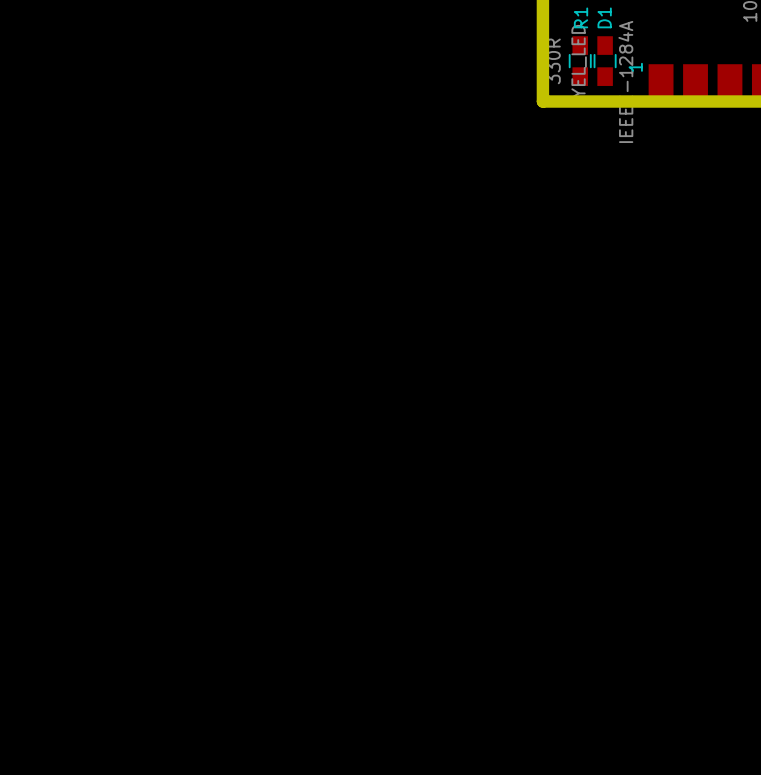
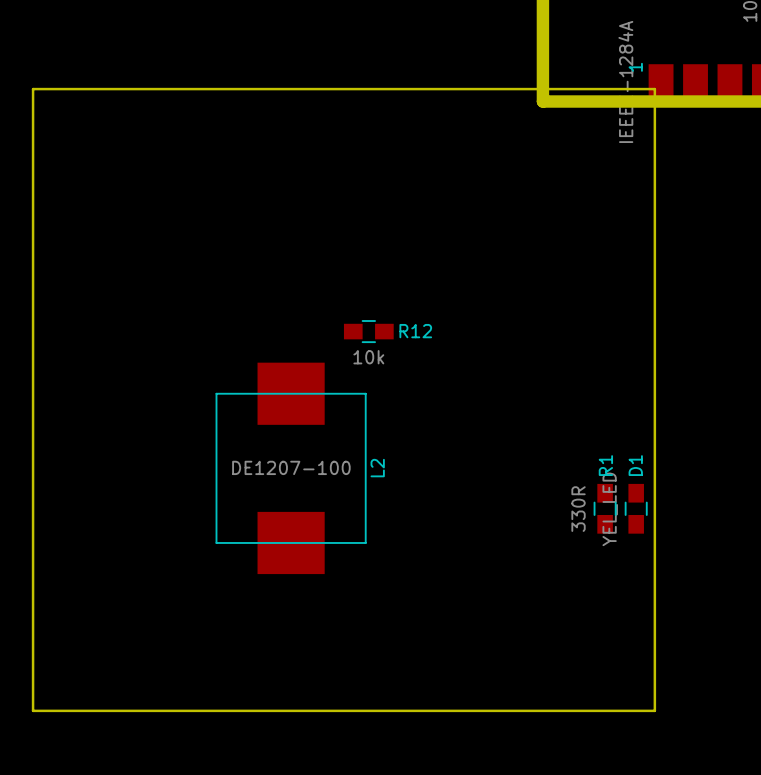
R1 position: (580, 61) -> (605, 508)
D1 position: (605, 61) -> (636, 508)
board edge: none -> (33, 89) (33, 710) (654, 710) (654, 89) (33, 89)
R12: none -> 10k (368, 331)
L2: none -> DE1207-100 (291, 468)

